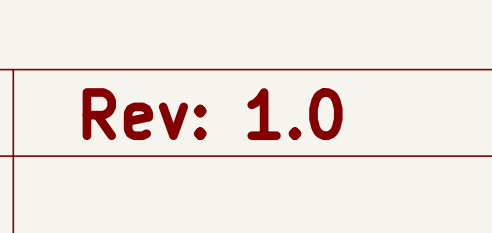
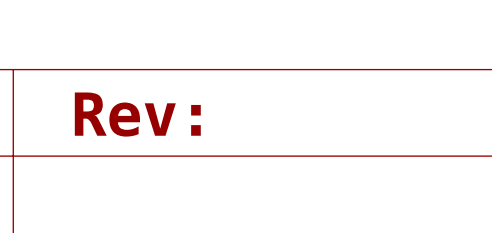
title block: Rev: 1.0 (212, 114) -> Rev: (137, 114)

